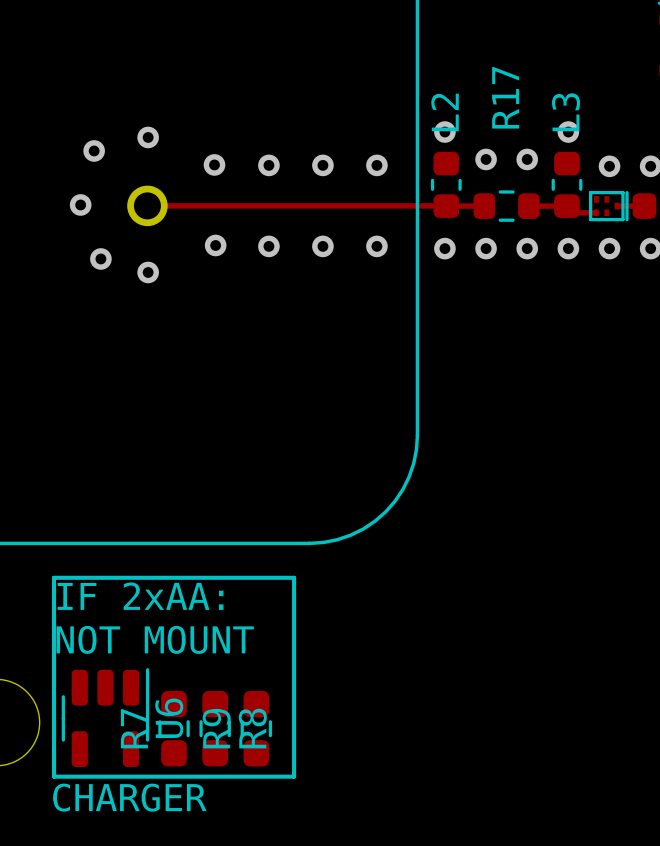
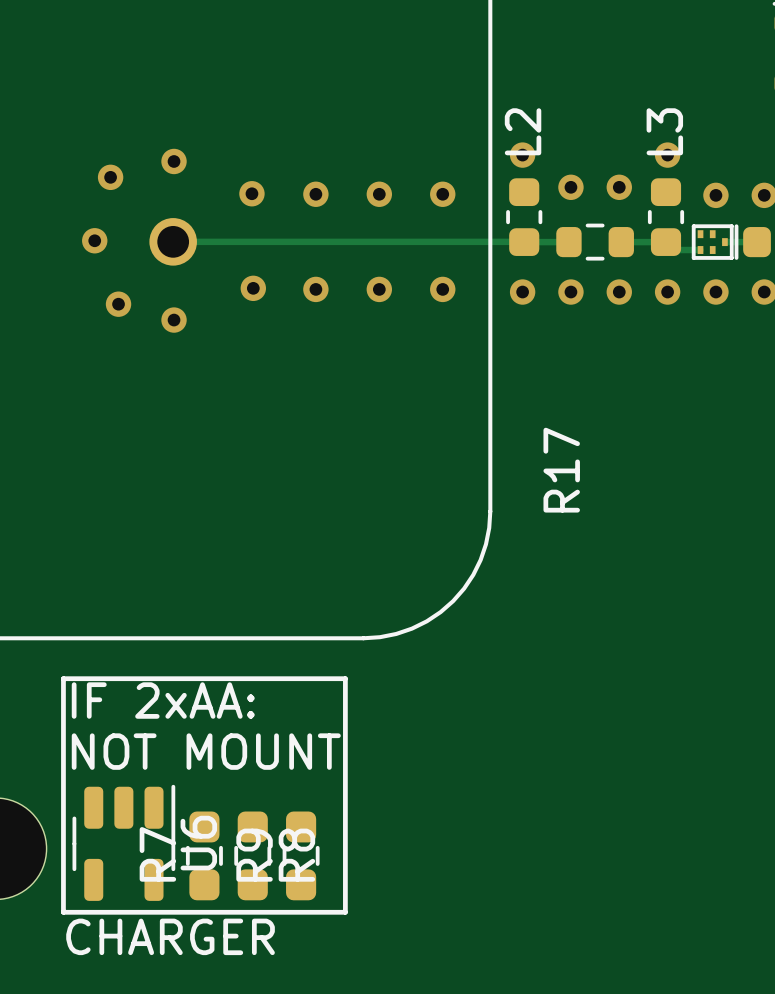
R17 name position: R17 (505, 97) -> R17 (561, 470)

